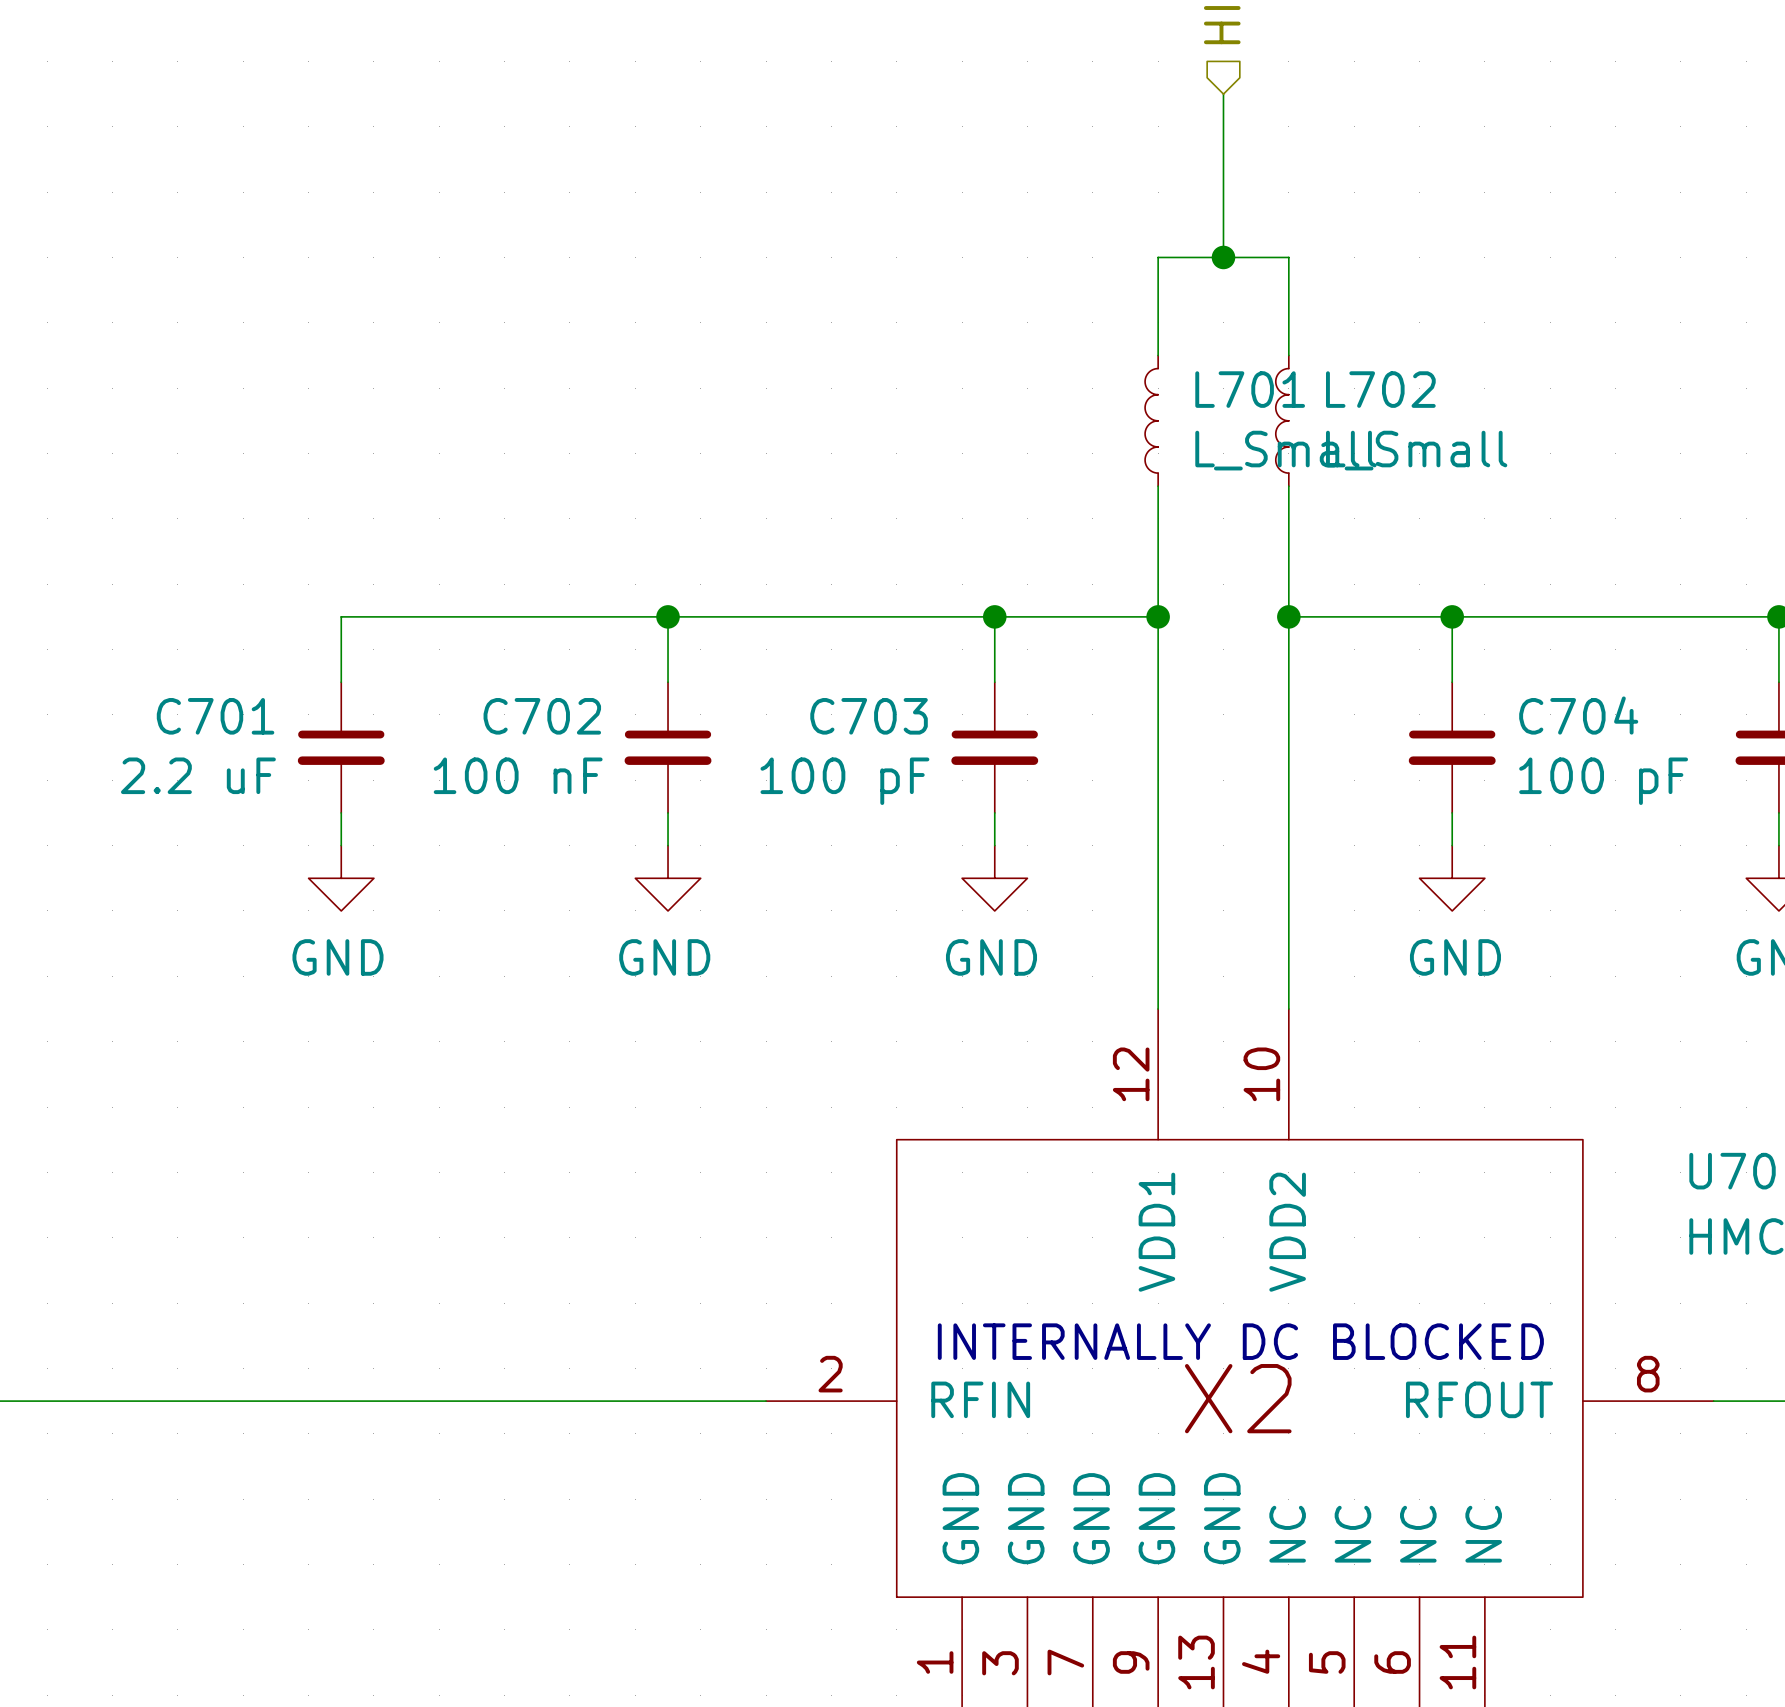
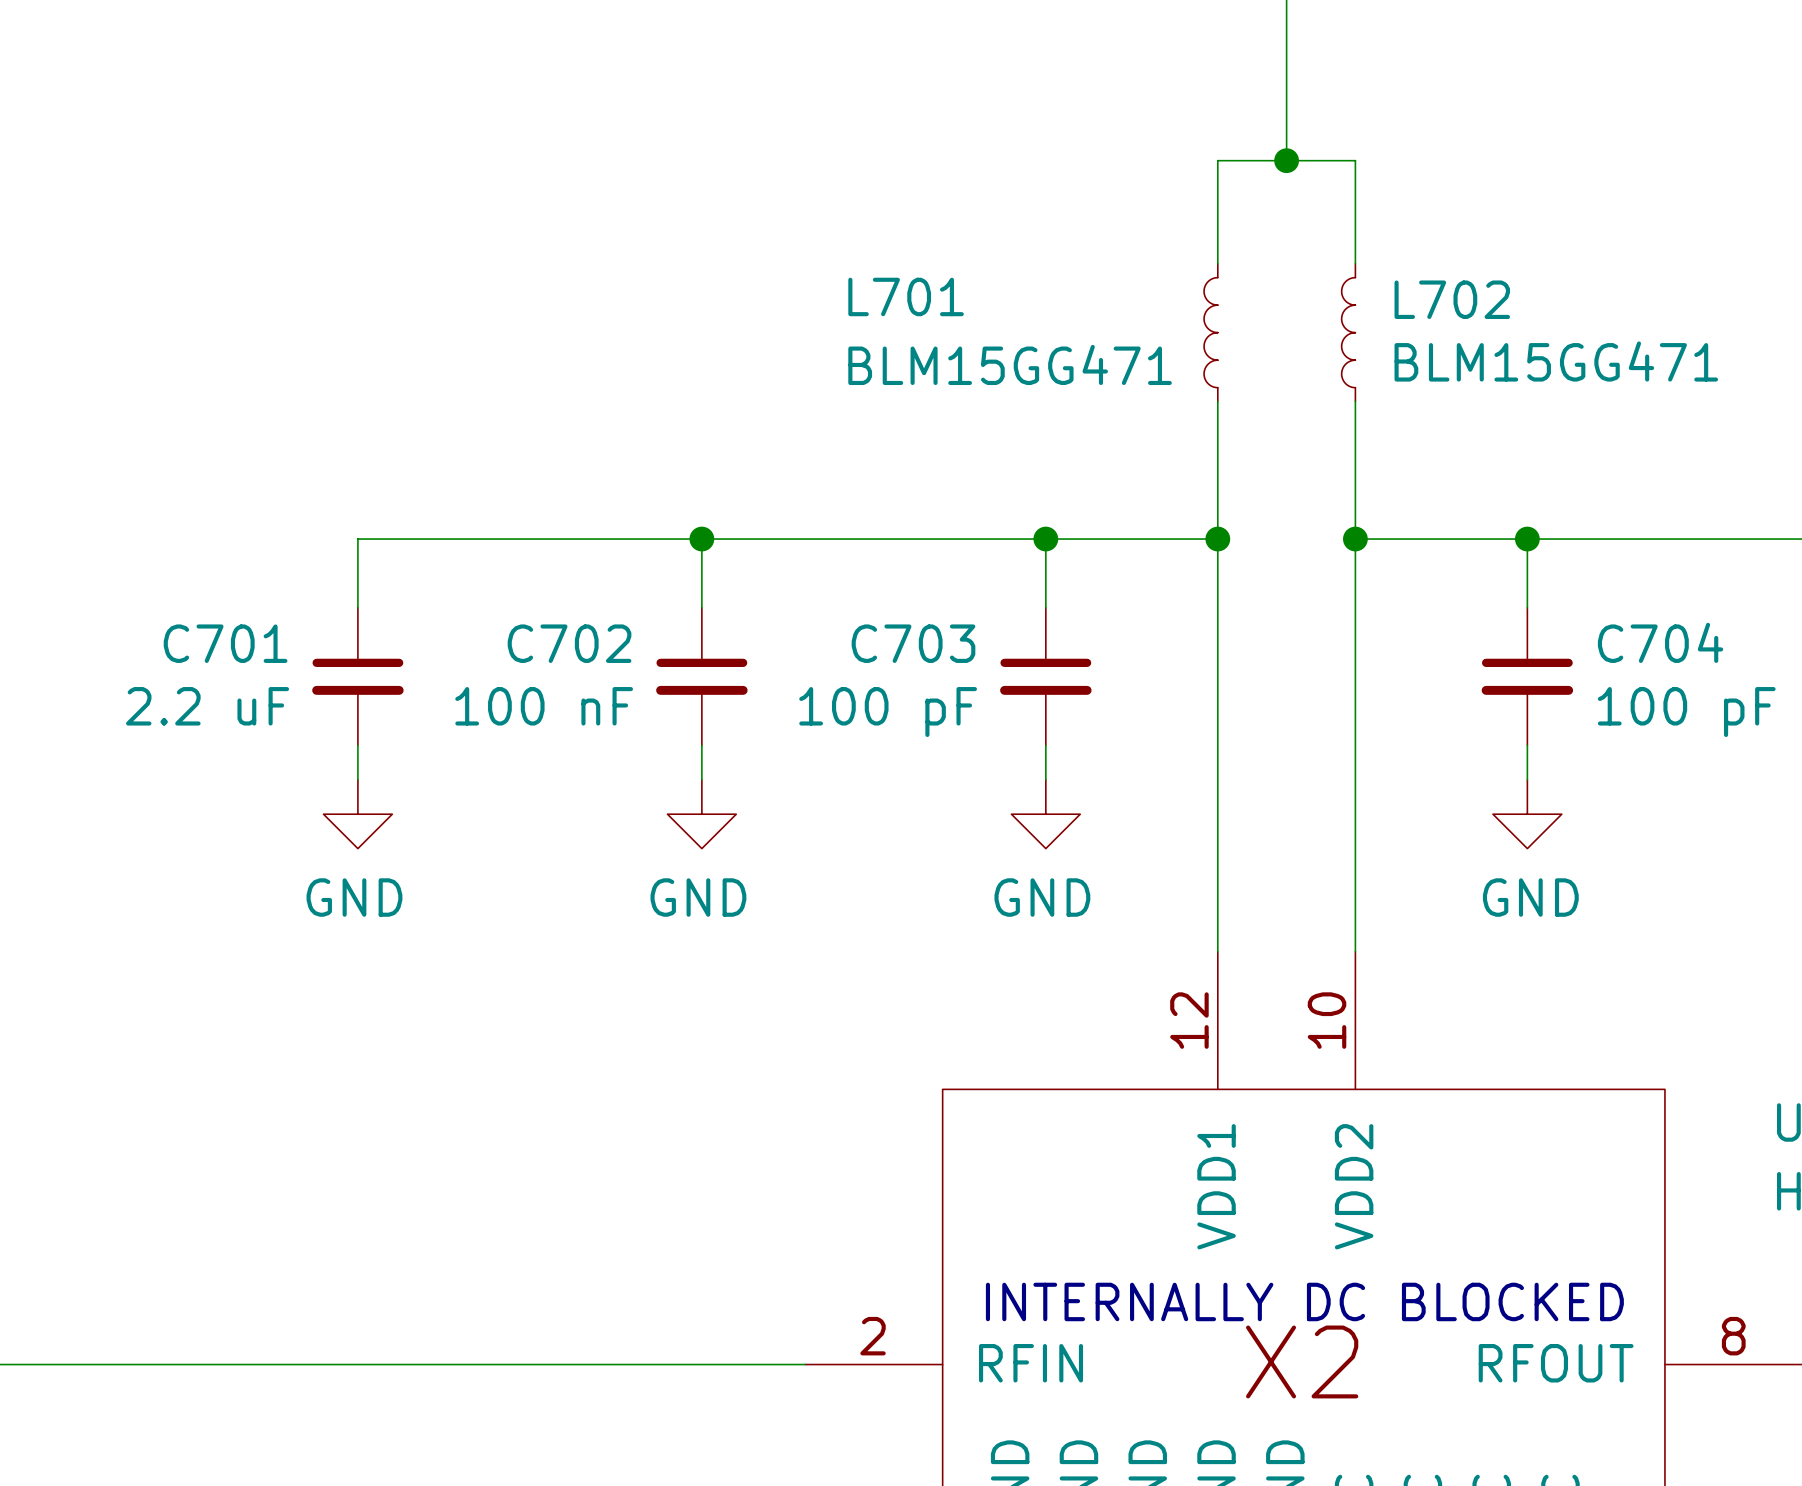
L701 name position: L701 (1250, 389) -> L701 (906, 296)
L701 value: L_Small (1285, 450) -> BLM15GG471 (1010, 364)
L702 value: L_Small (1416, 450) -> BLM15GG471 (1556, 361)

